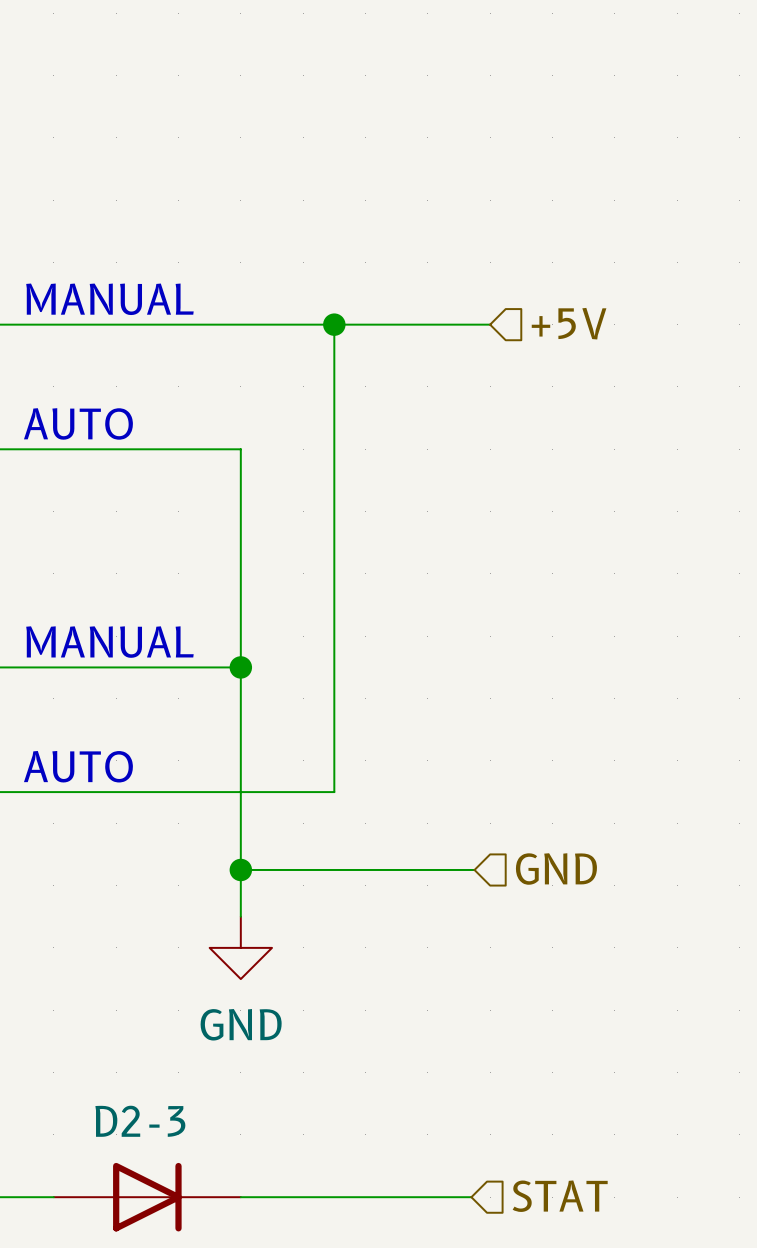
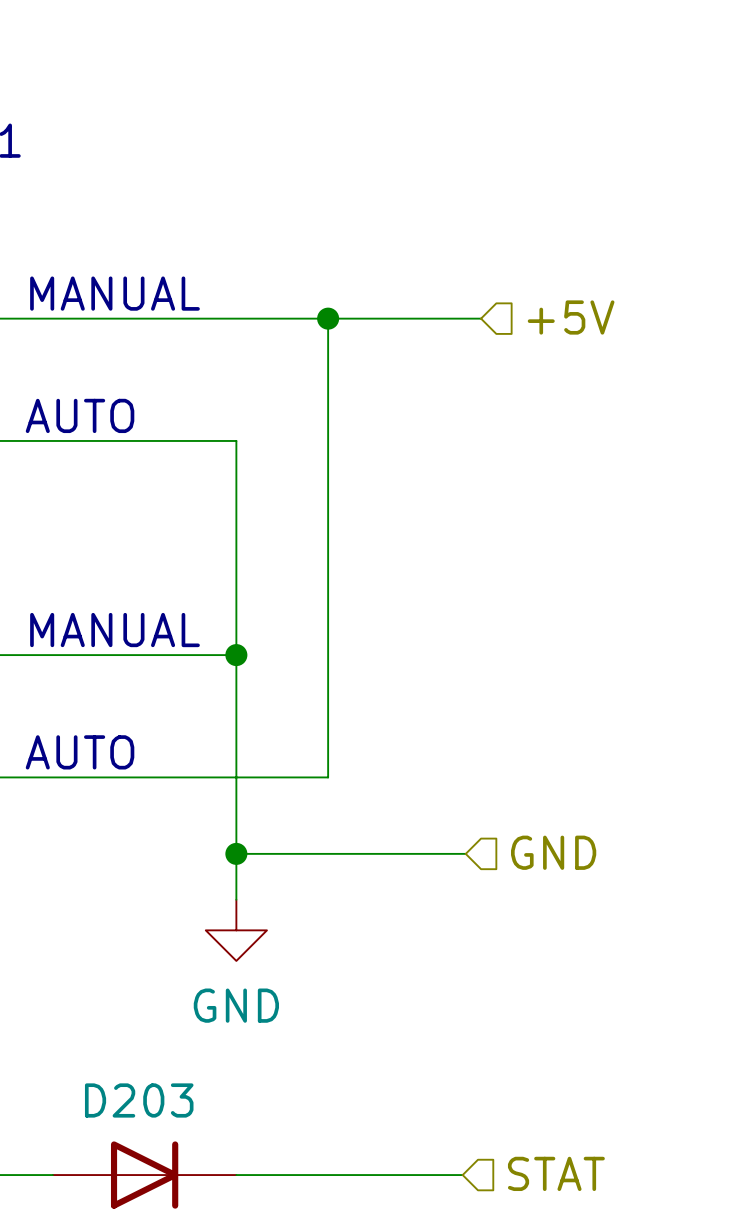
D2-3 name: D2-3 (140, 1121) -> D203 (139, 1100)

